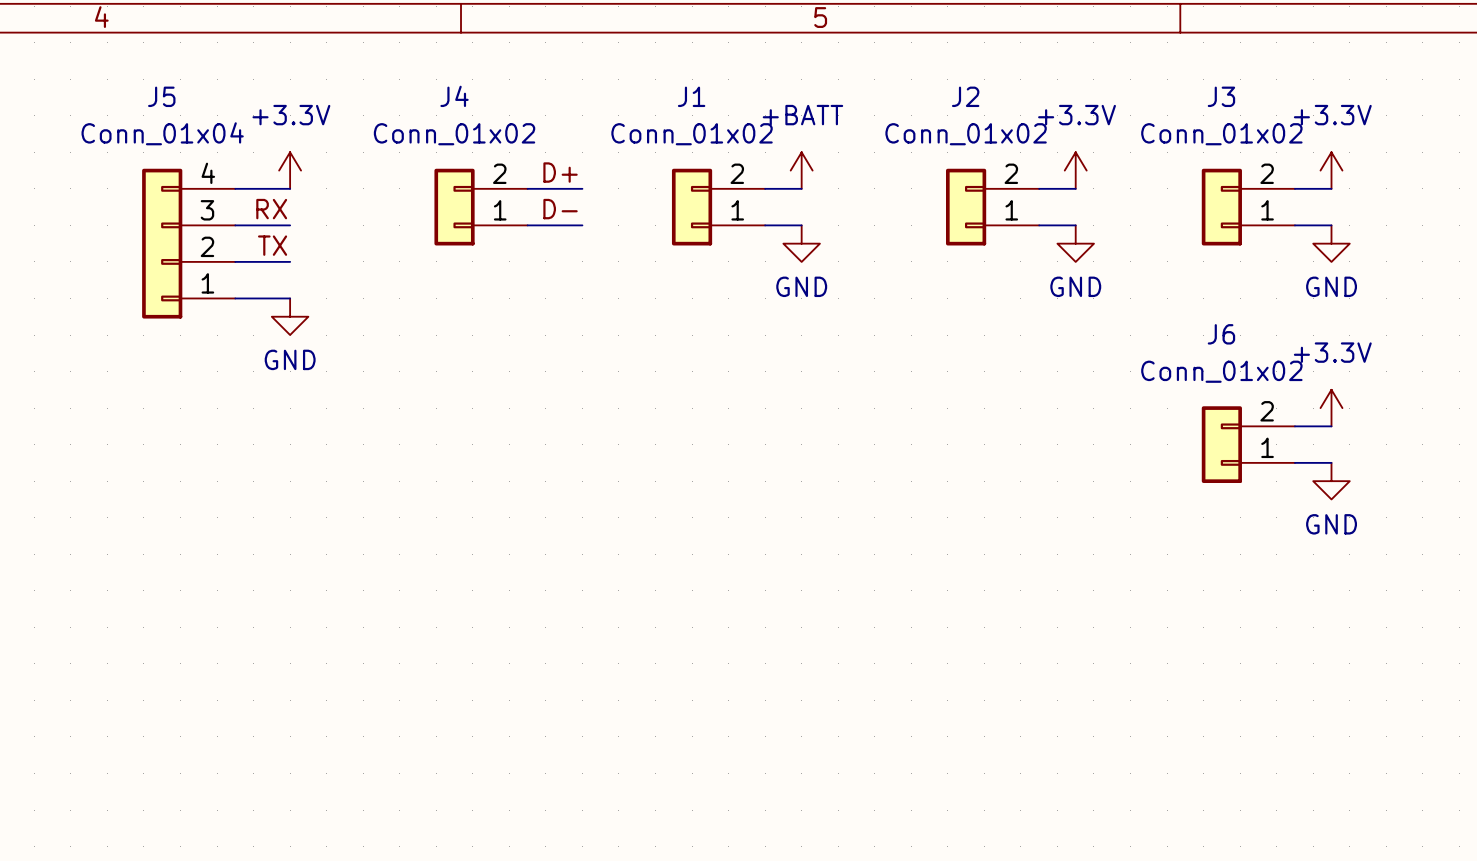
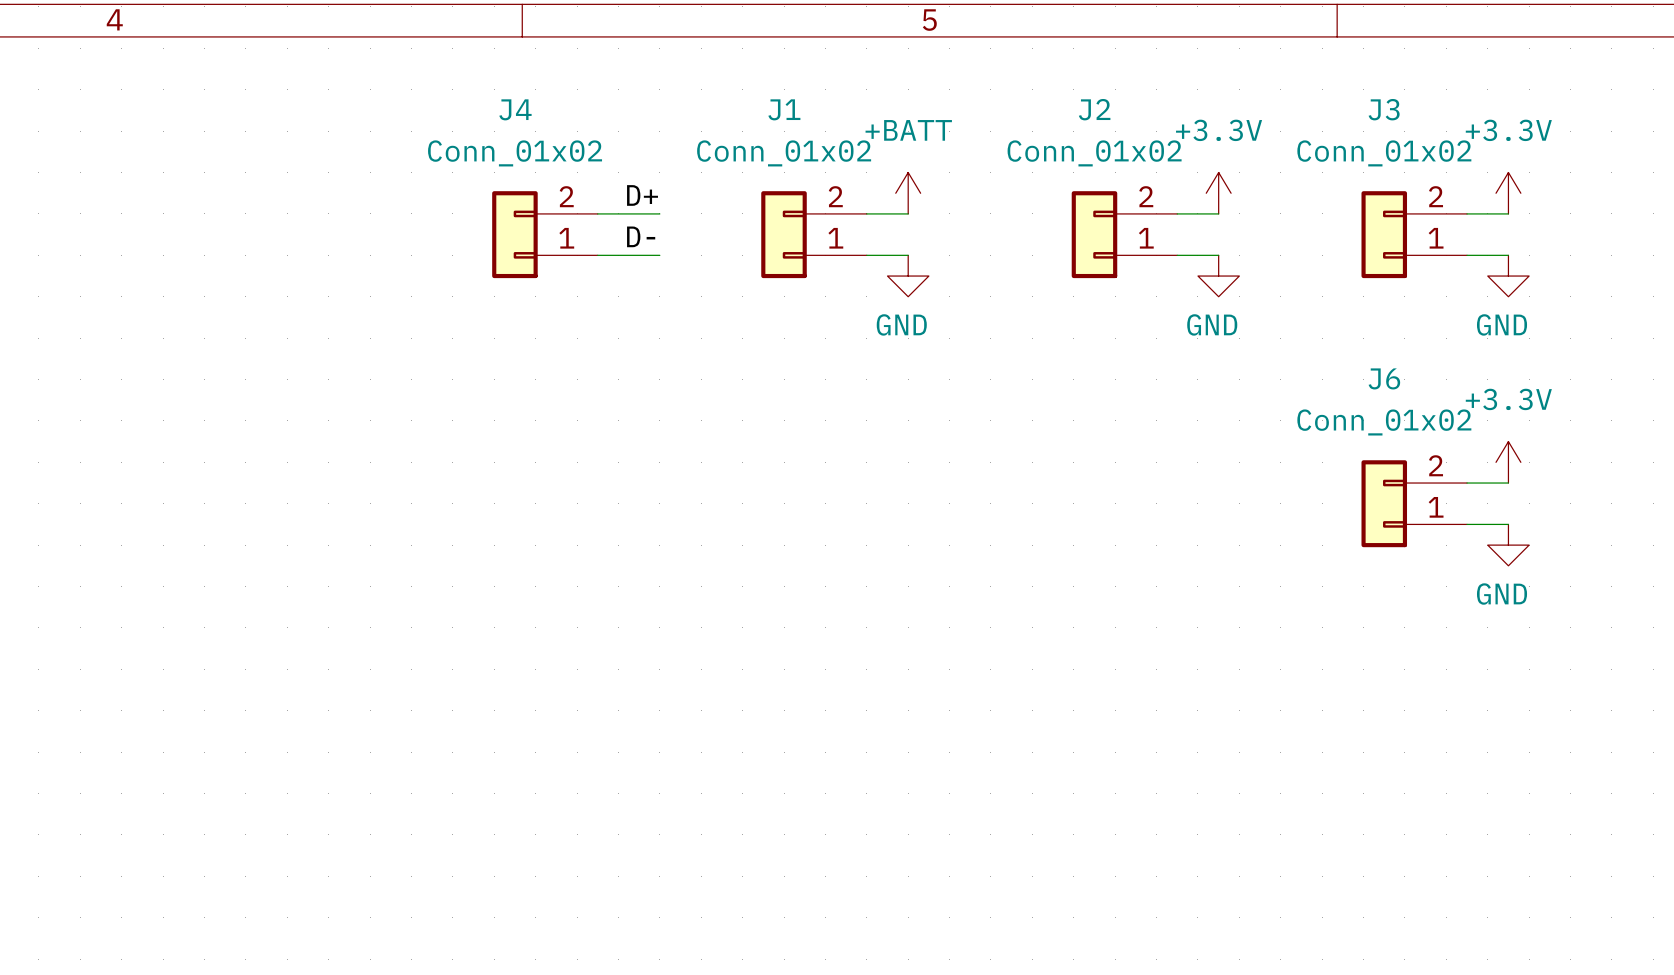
power symbol: +3.3V (290, 170) -> none
wire: (235, 188) (290, 188) -> none
label: RX (271, 209) -> none
wire: (235, 225) (290, 225) -> none
J5: Conn_01x04 (188, 243) -> none
label: TX (272, 245) -> none
wire: (235, 261) (290, 261) -> none
wire: (235, 298) (290, 298) -> none
power symbol: GND (290, 316) -> none

